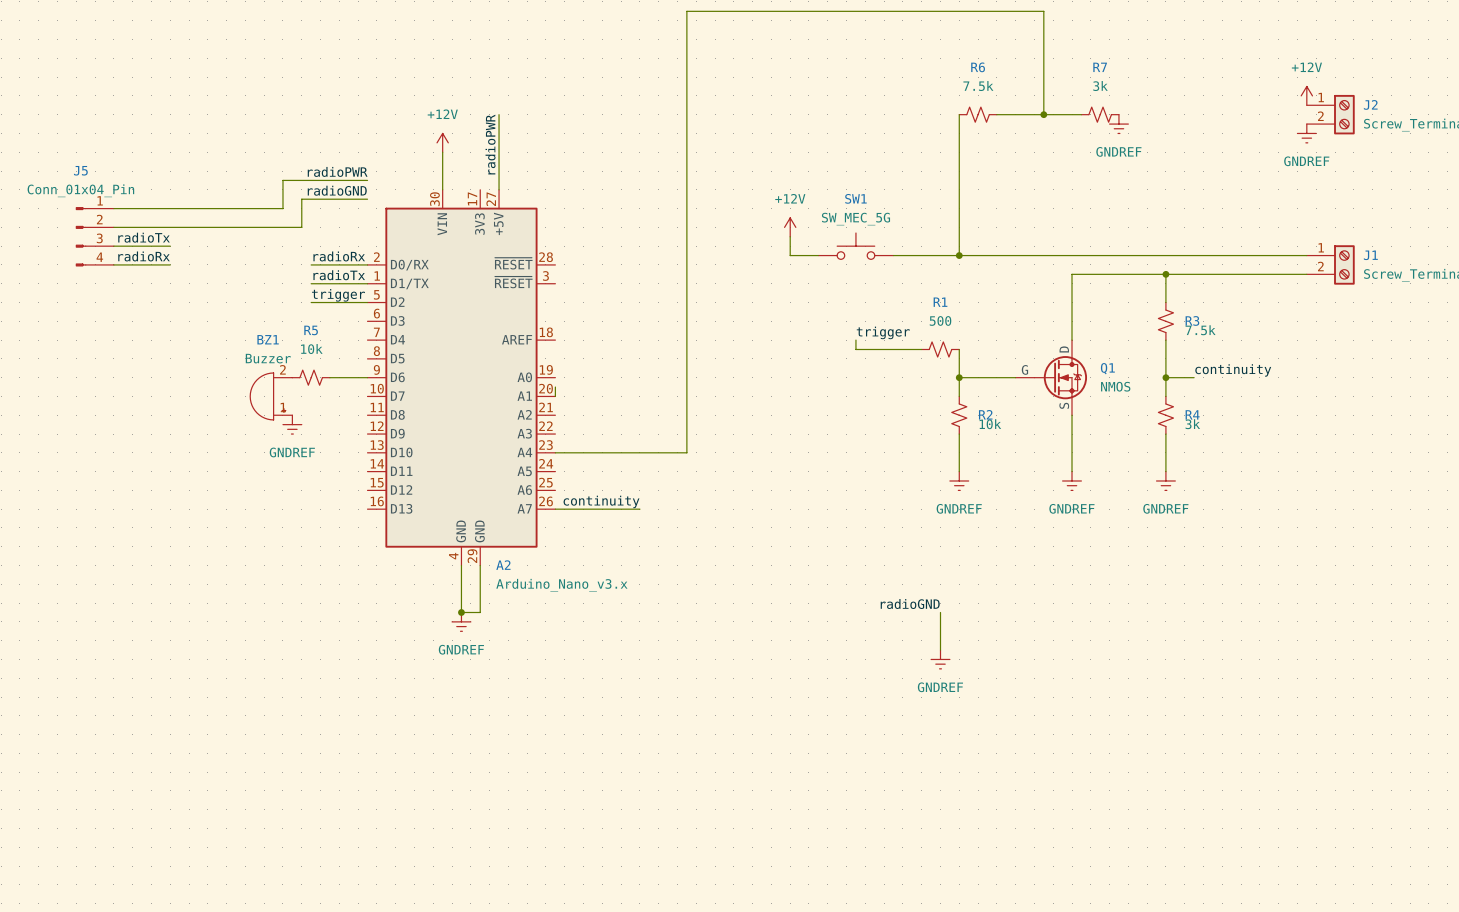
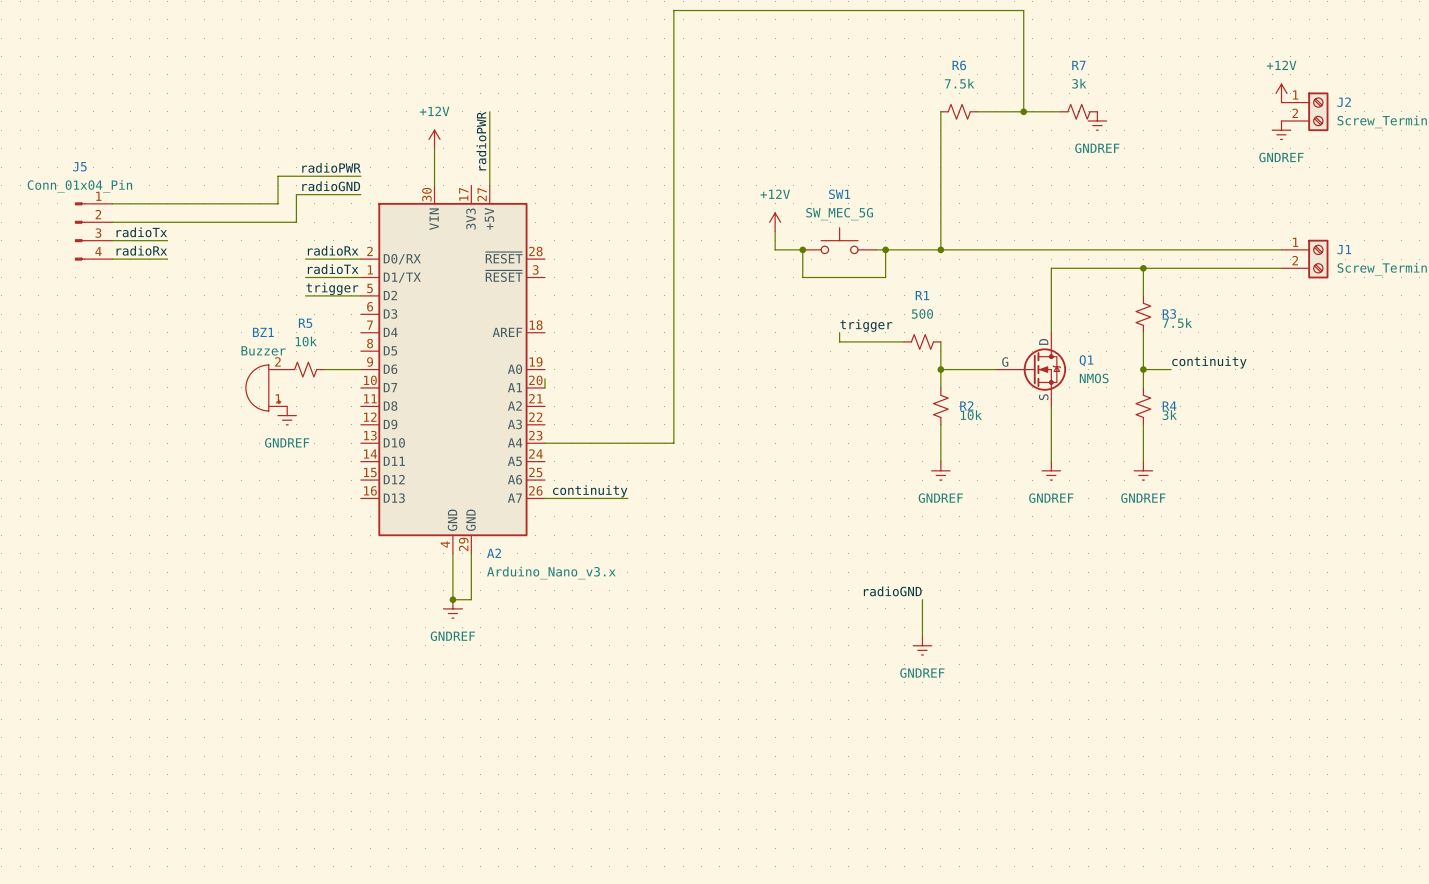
wire: none -> (802, 249) (802, 277) (885, 277) (885, 249)
junction: none -> (802, 249)
junction: none -> (885, 249)

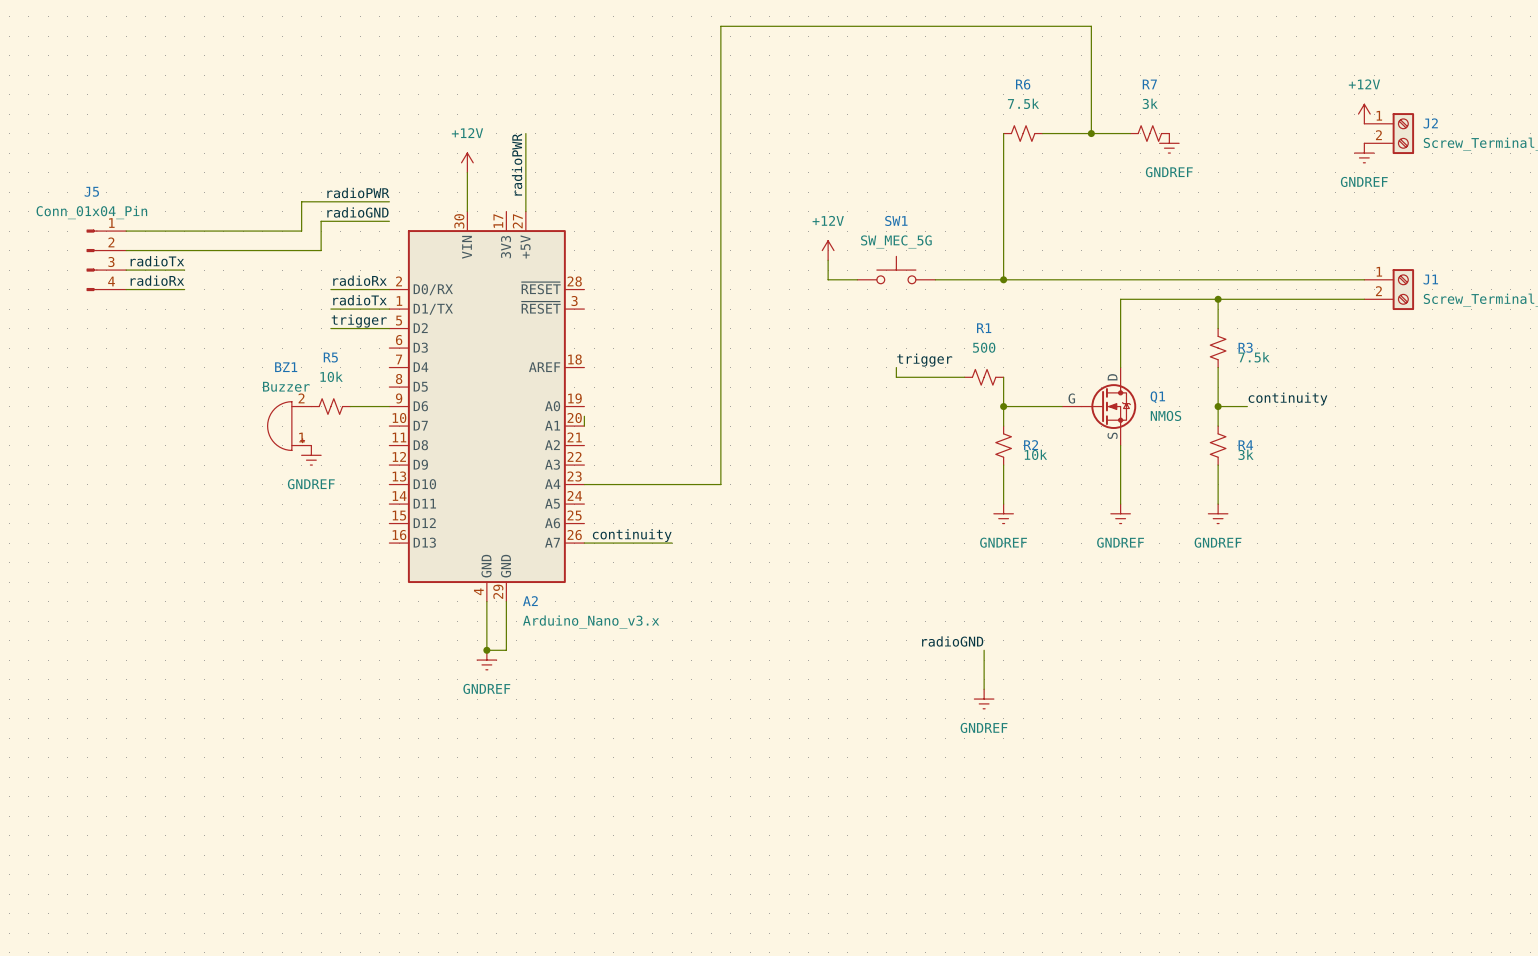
wire: (802, 249) (802, 277) (885, 277) (885, 249) -> none
junction: (802, 249) -> none
junction: (885, 249) -> none

